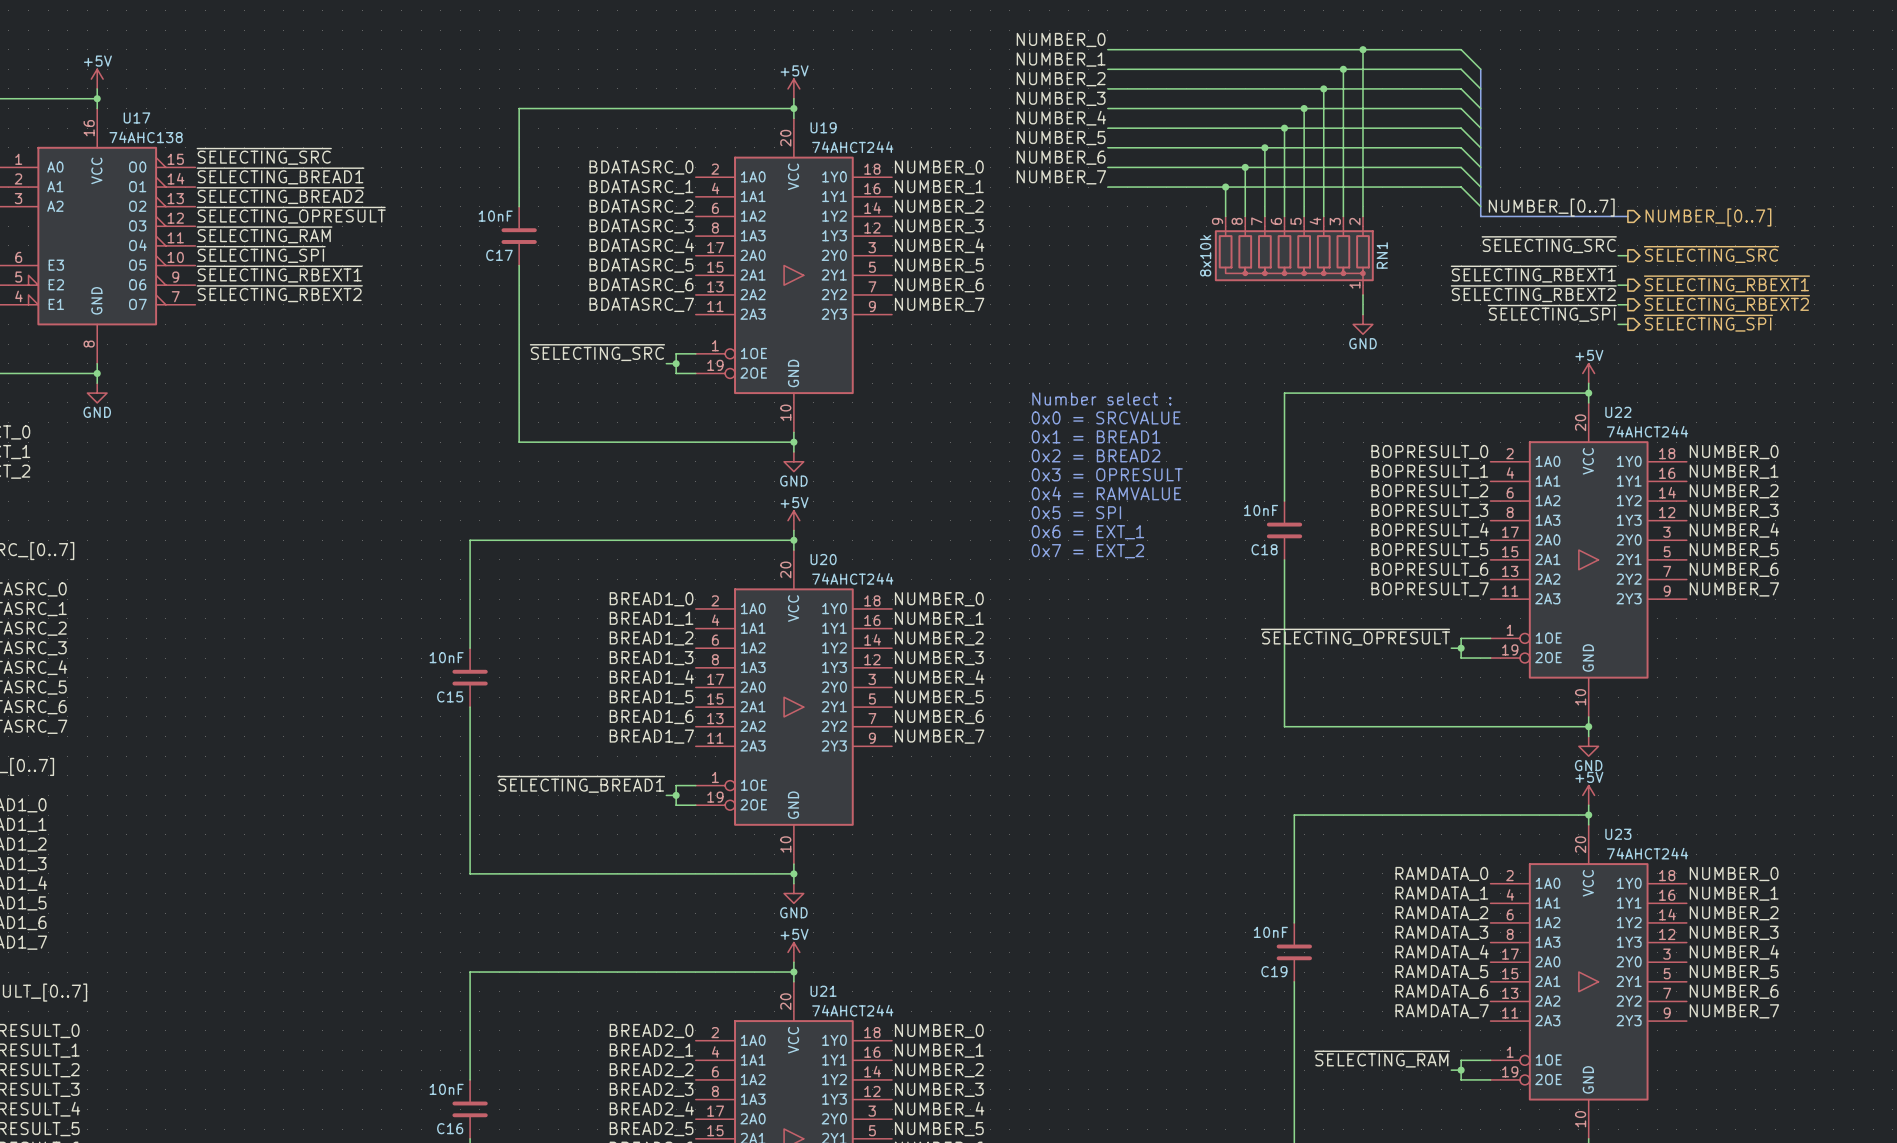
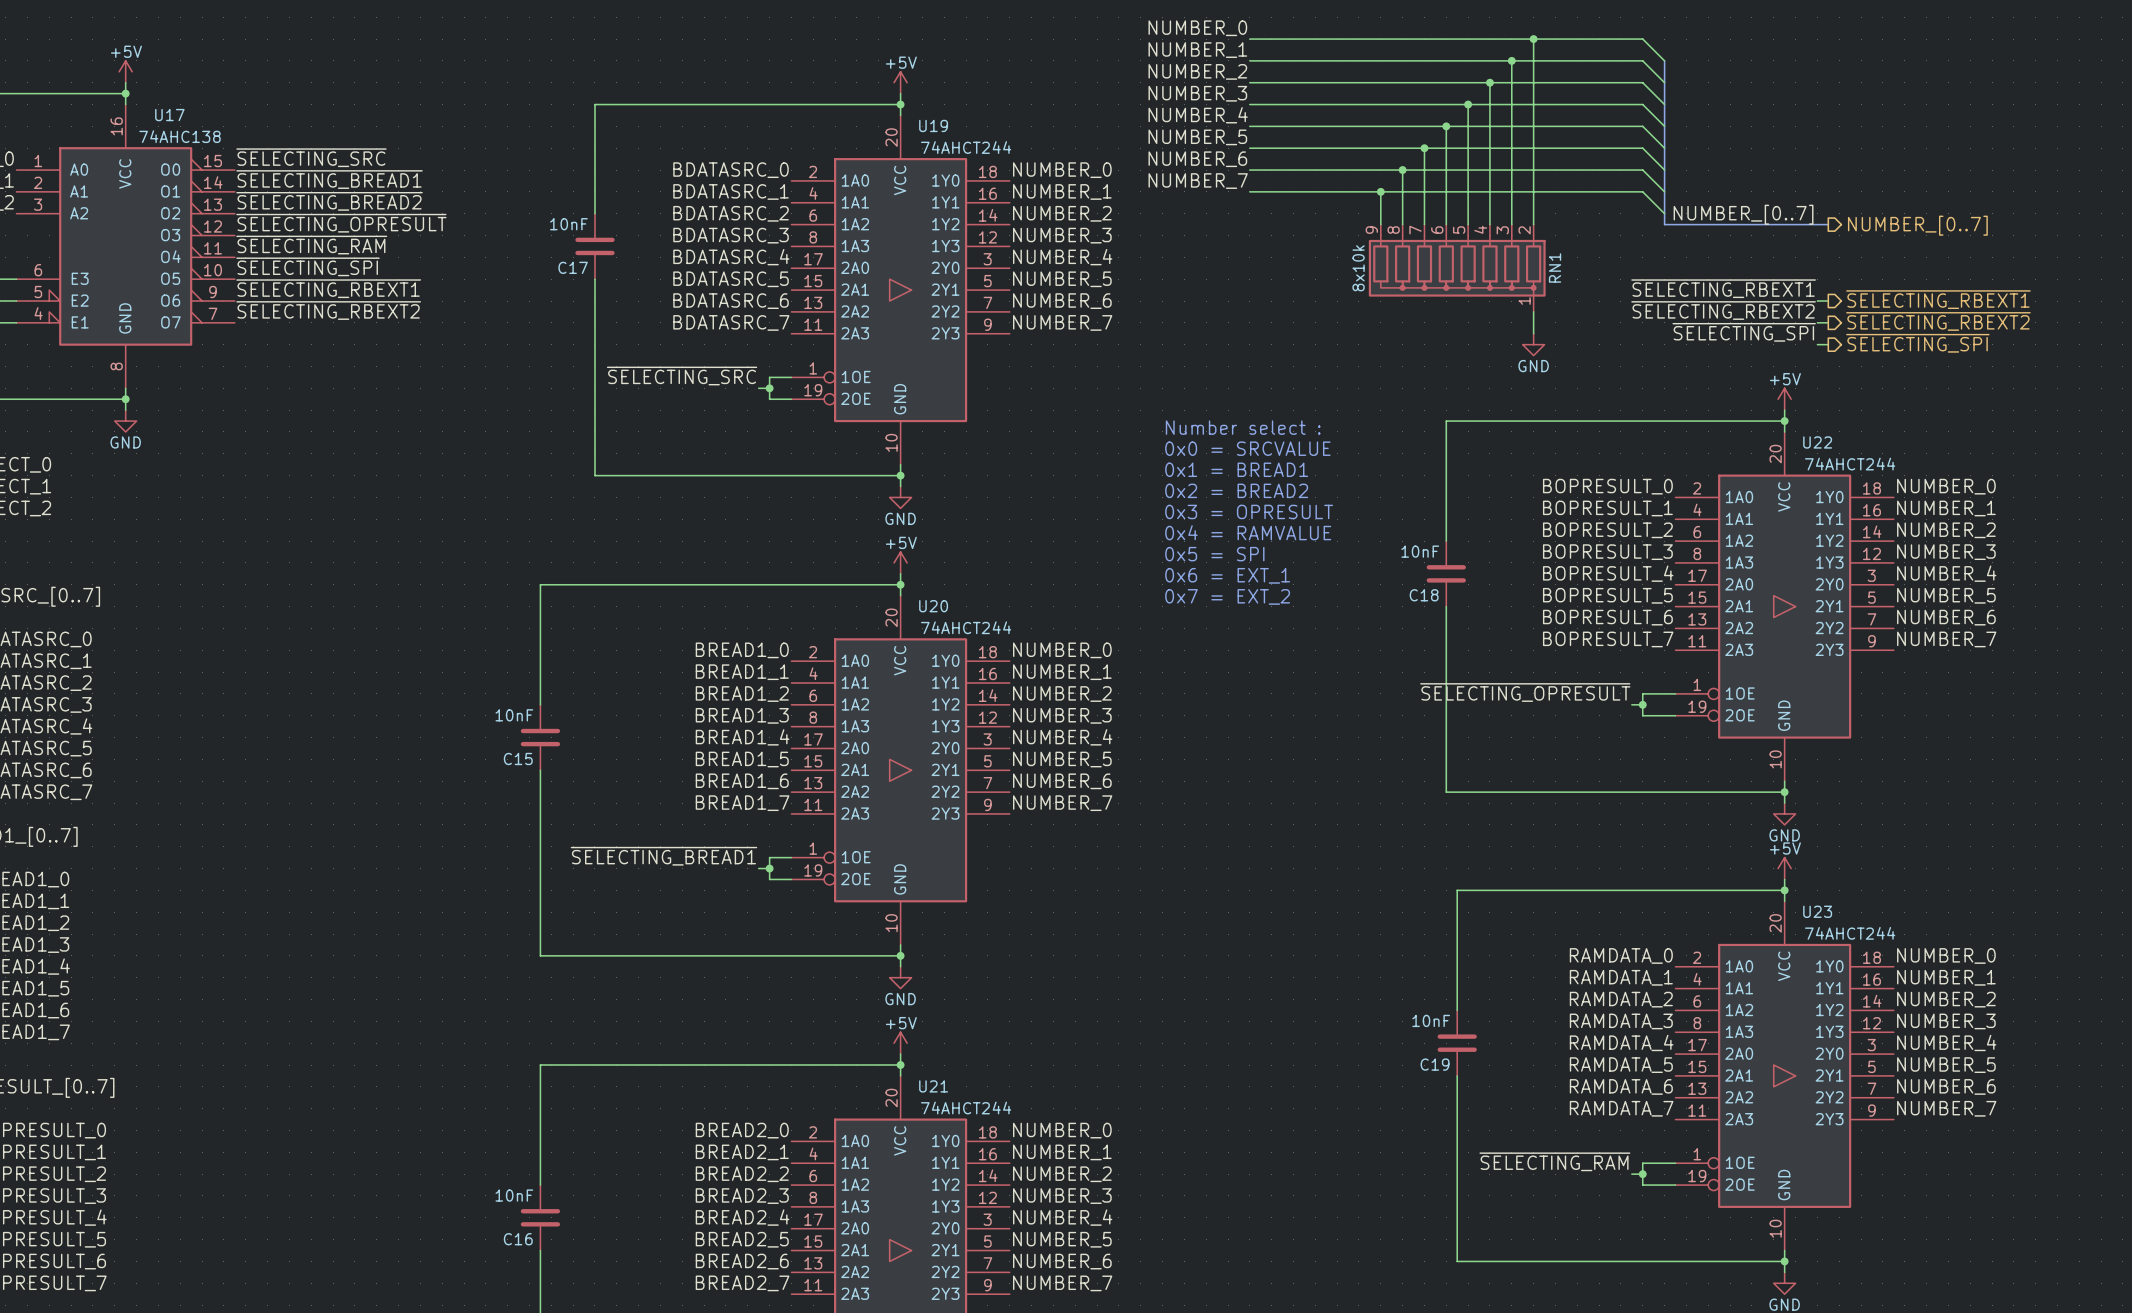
label: ~{SELECTING_SRC} (1549, 244) -> none
hierarchical label: ~{SELECTING_SRC} (1711, 254) -> none
wire: (1618, 255) (1627, 255) -> none

